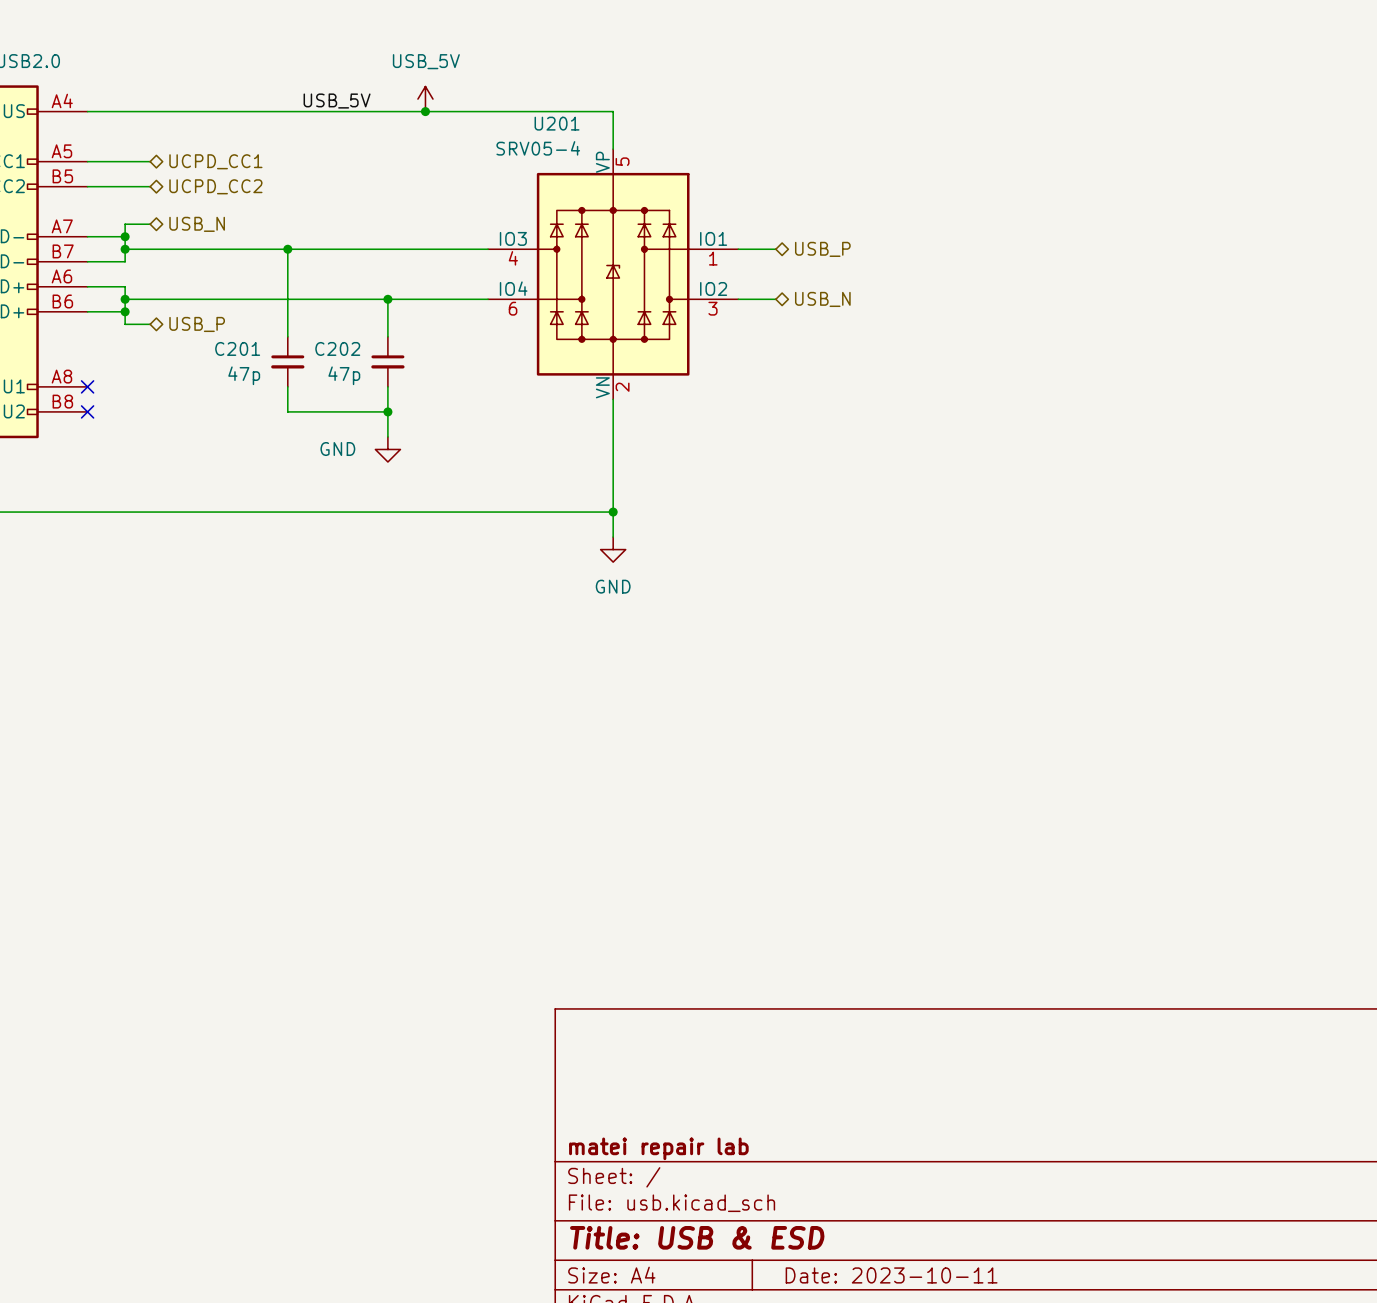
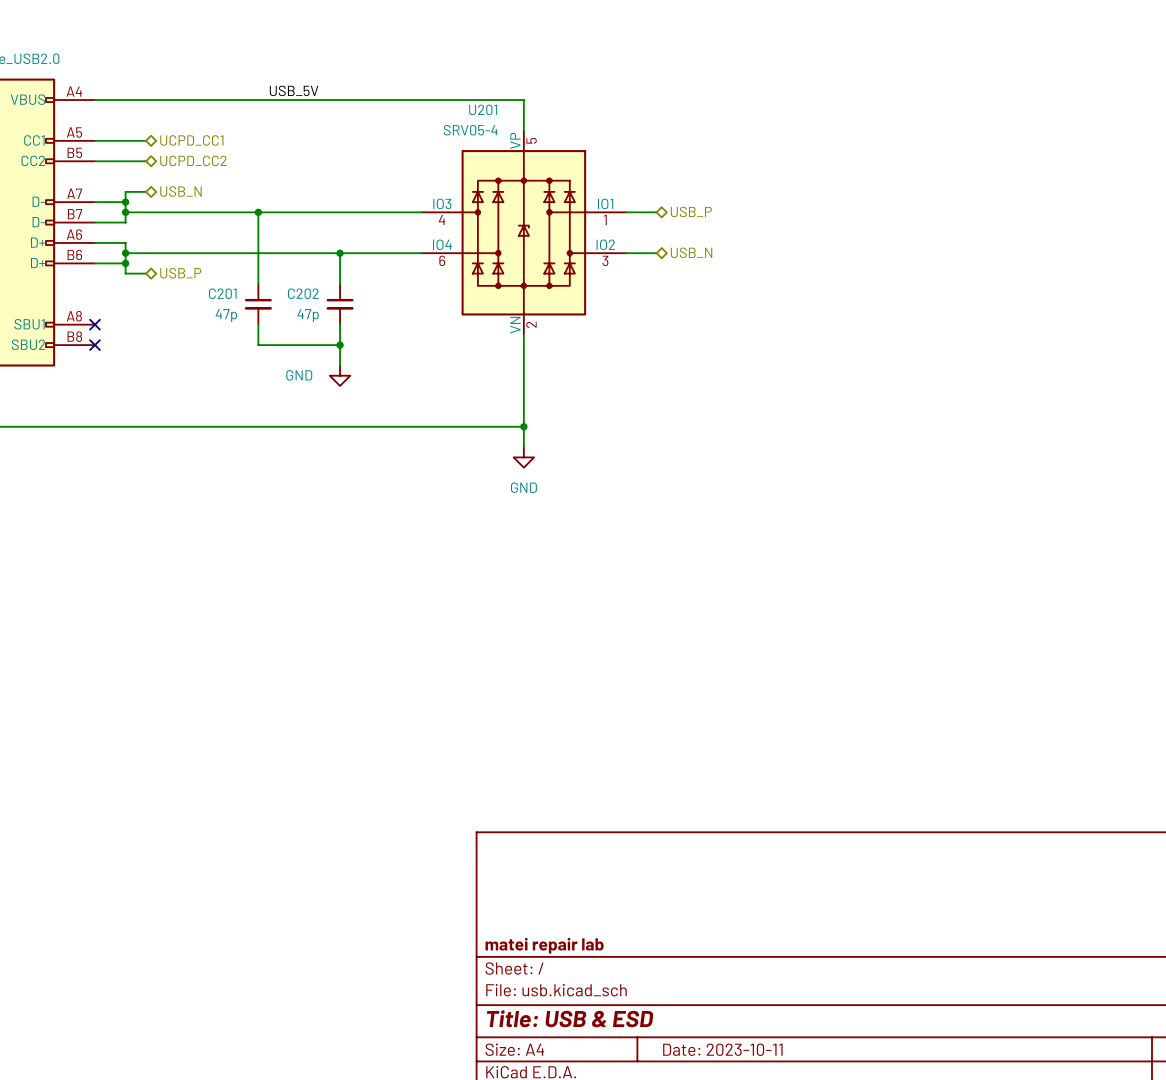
power symbol: USB_5V (425, 99) -> none
junction: (425, 111) -> none

